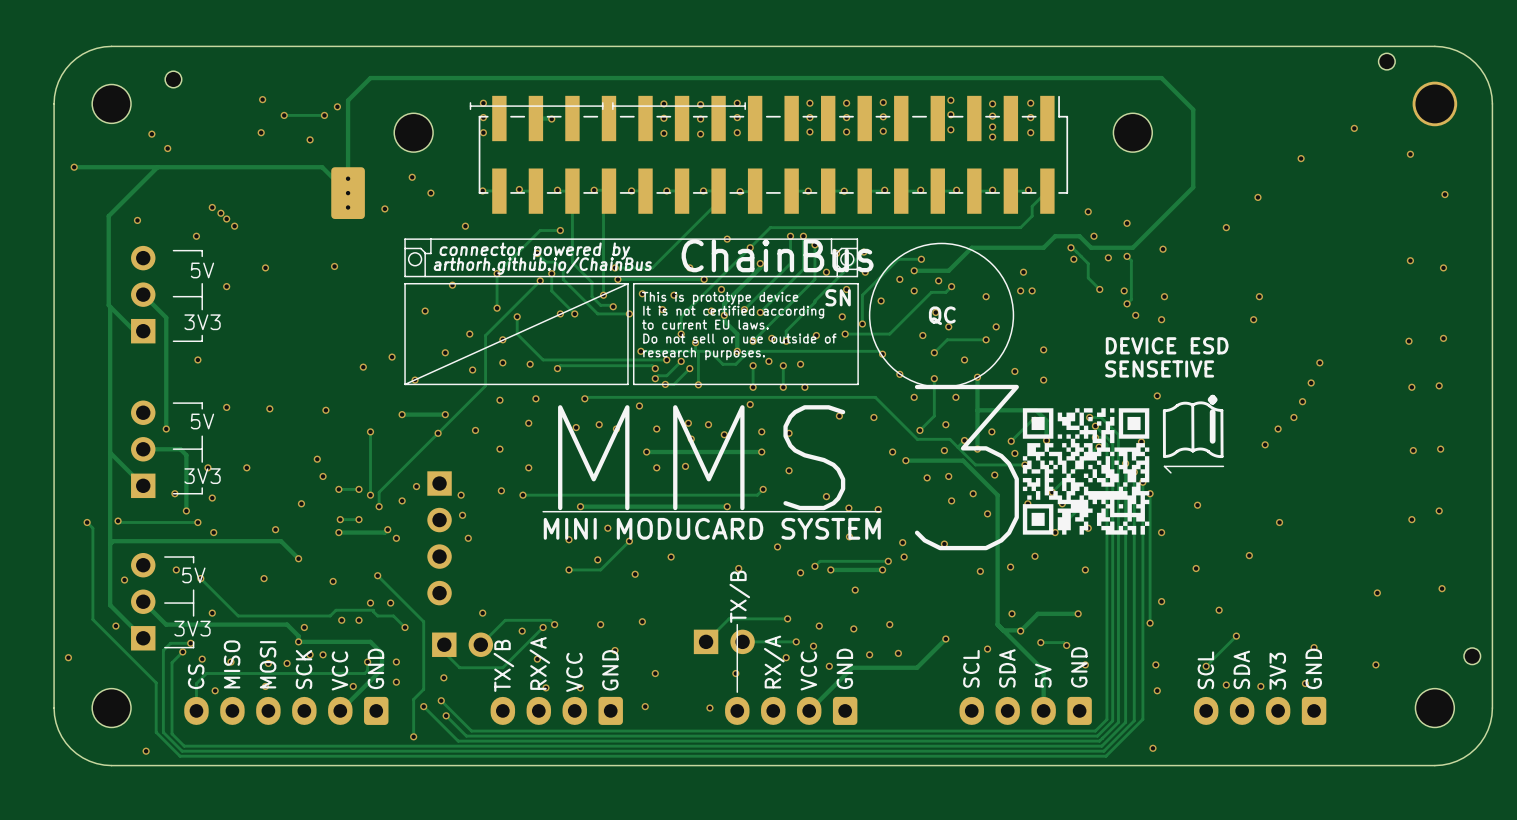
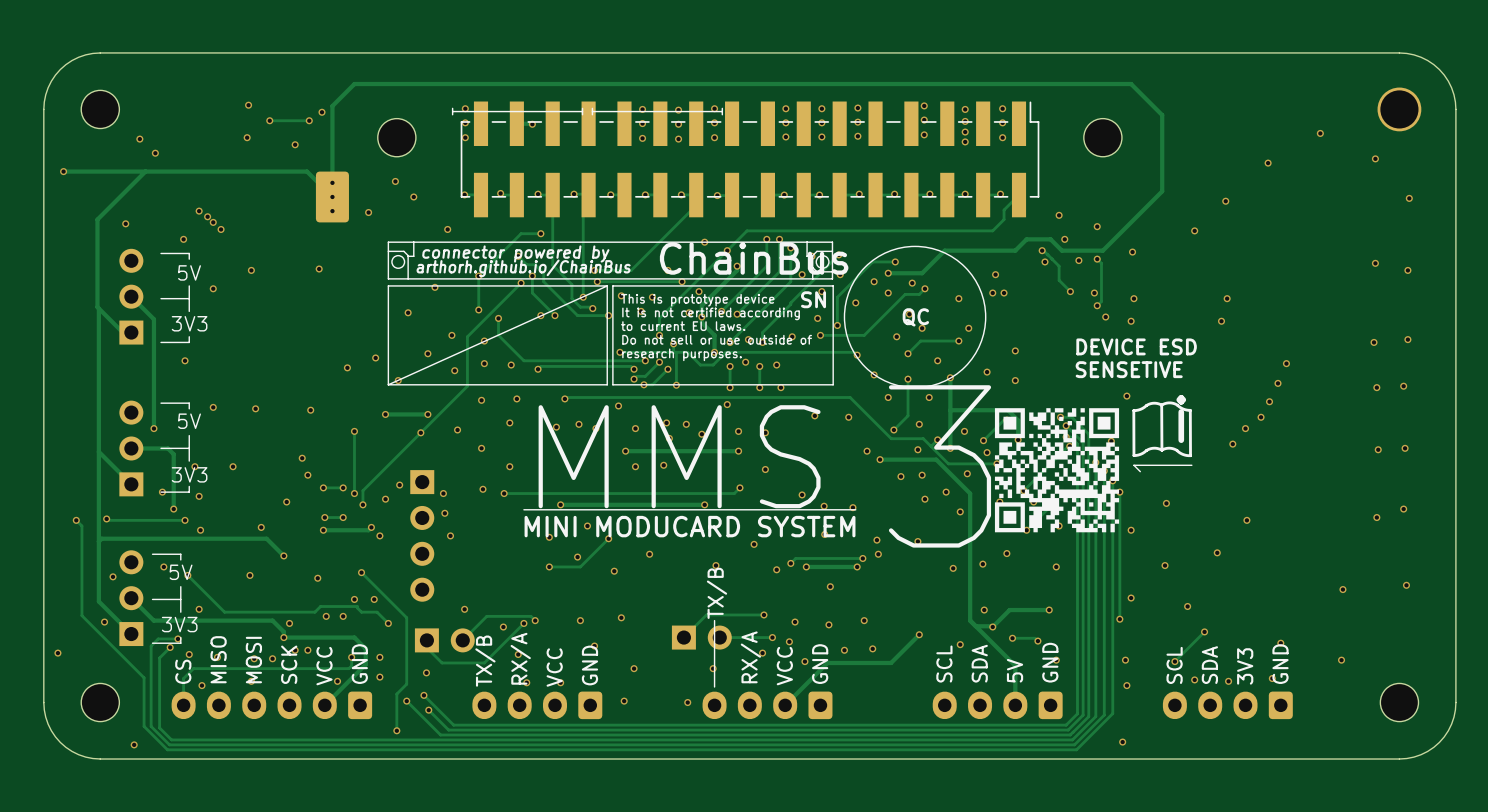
part: (1386, 61) -> none
part: (173, 79) -> none
part: (1472, 656) -> none

